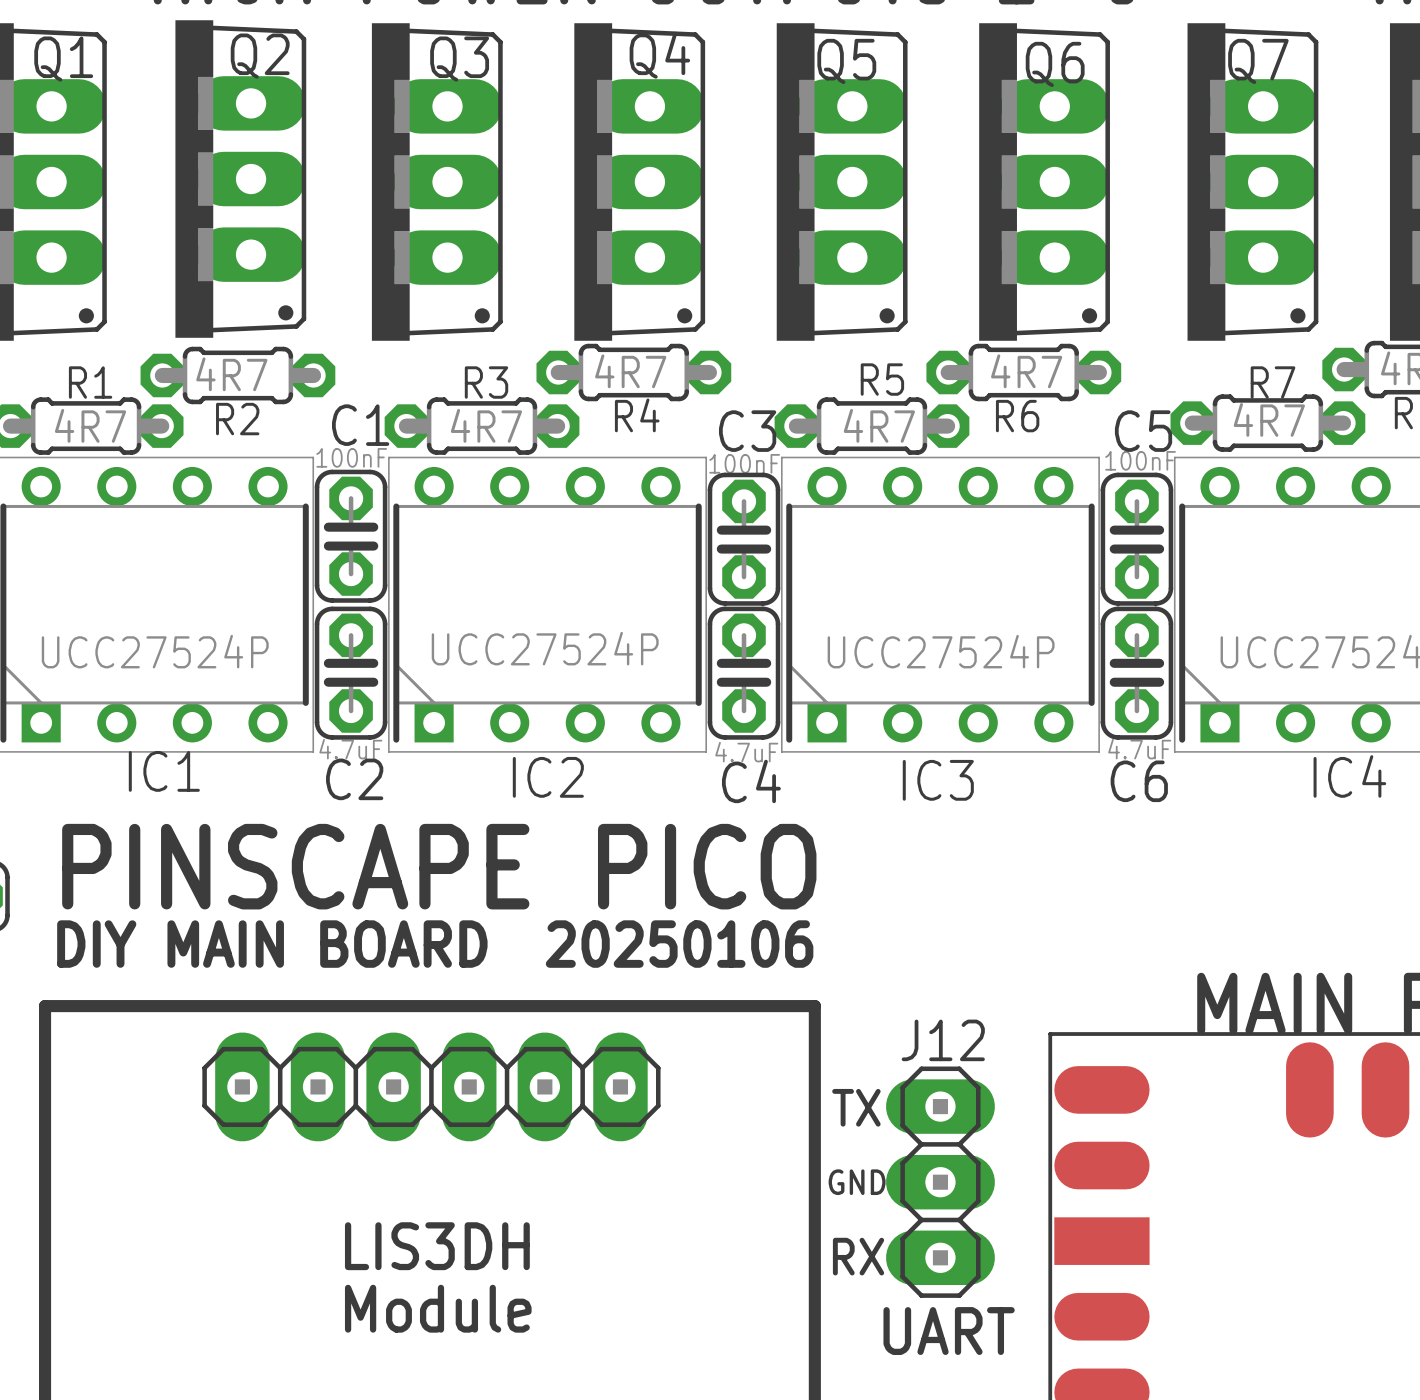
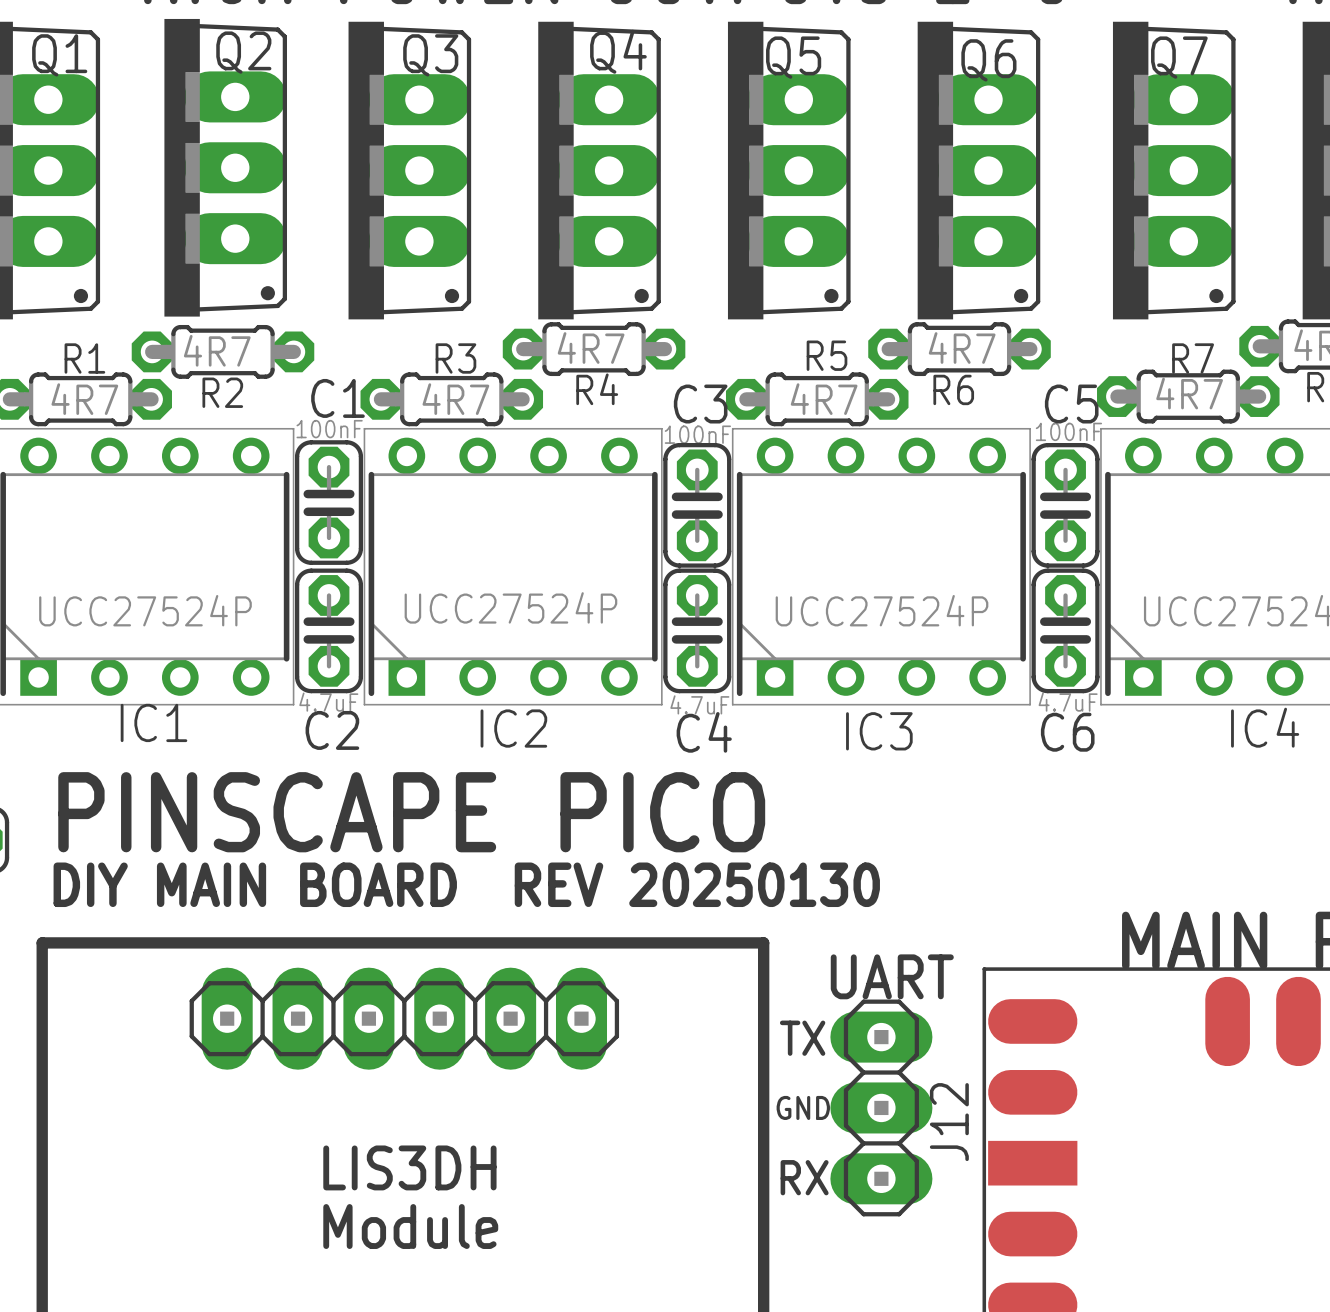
text: DIY MAIN BOARD 20250106 (435, 944) -> DIY MAIN BOARD REV 20250130 (466, 884)
J12 name rotation: 0° (943, 1040) -> 90° counterclockwise (949, 1122)
J12 name position: J12 (943, 1040) -> J12 (949, 1122)
text position: UART (949, 1331) -> UART (892, 976)

